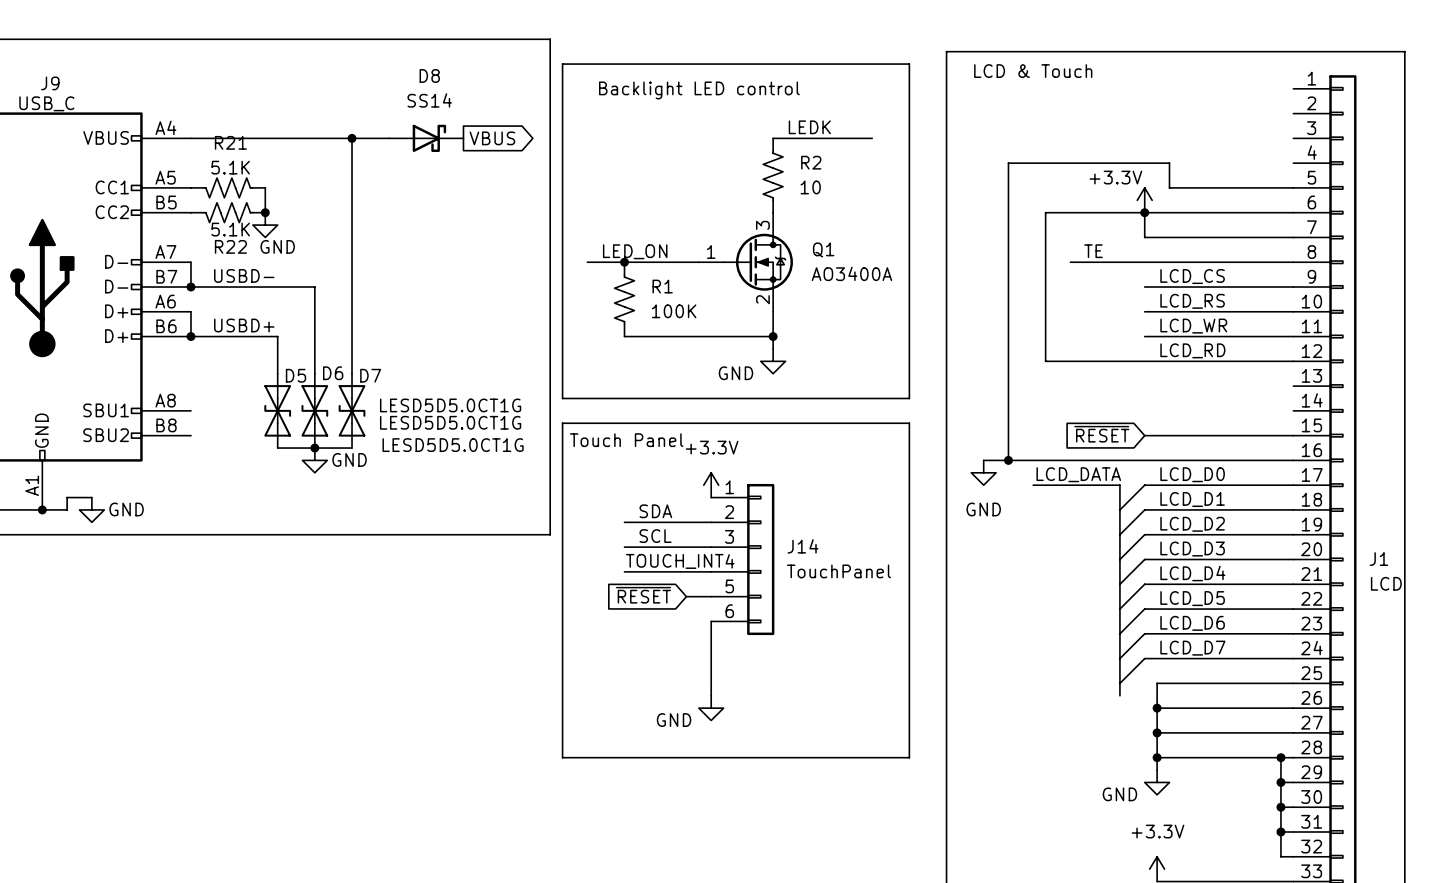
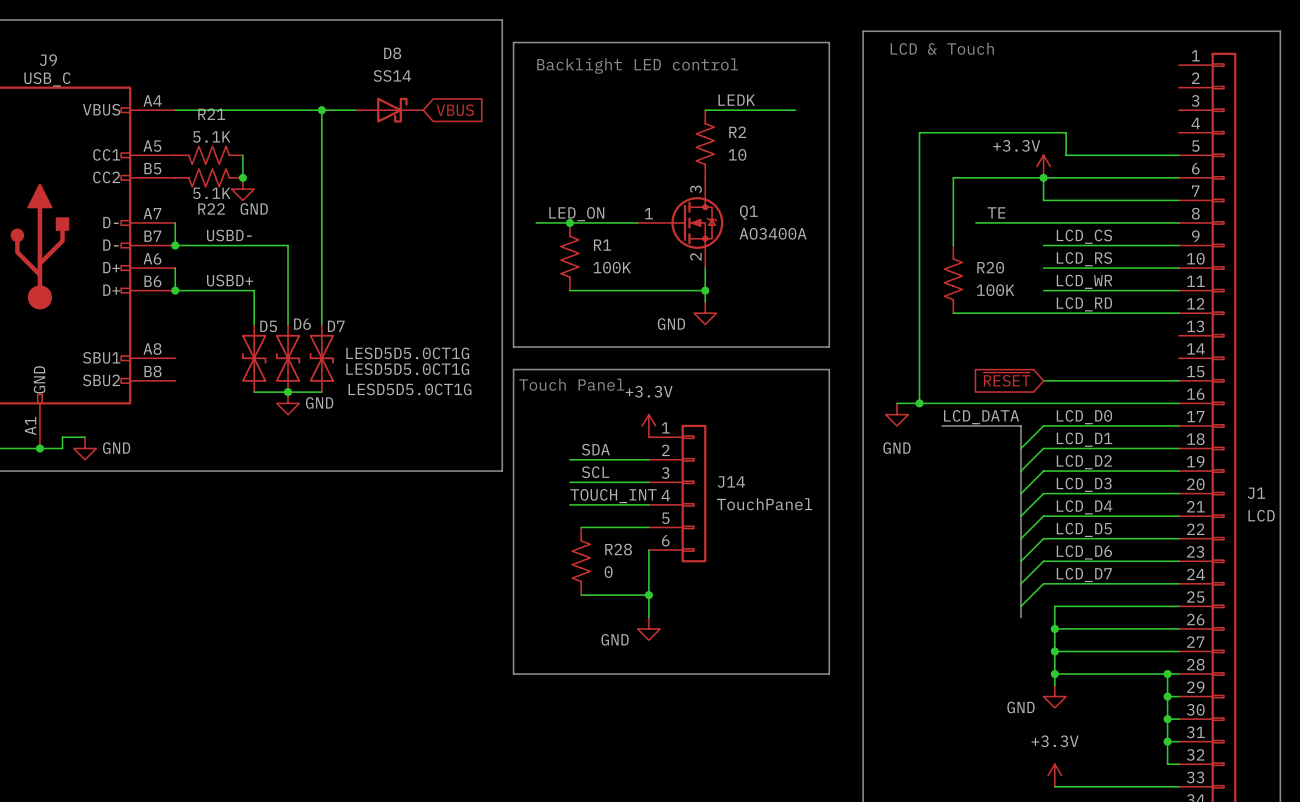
global label shape: output (492, 138) -> input (455, 110)
R20: none -> 100K (953, 279)
global label: ~{RESET} (643, 595) -> none
wire: none -> (581, 527) (626, 527)
R28: none -> 0 (581, 561)
wire: none -> (581, 595) (648, 595)
junction: none -> (648, 595)

